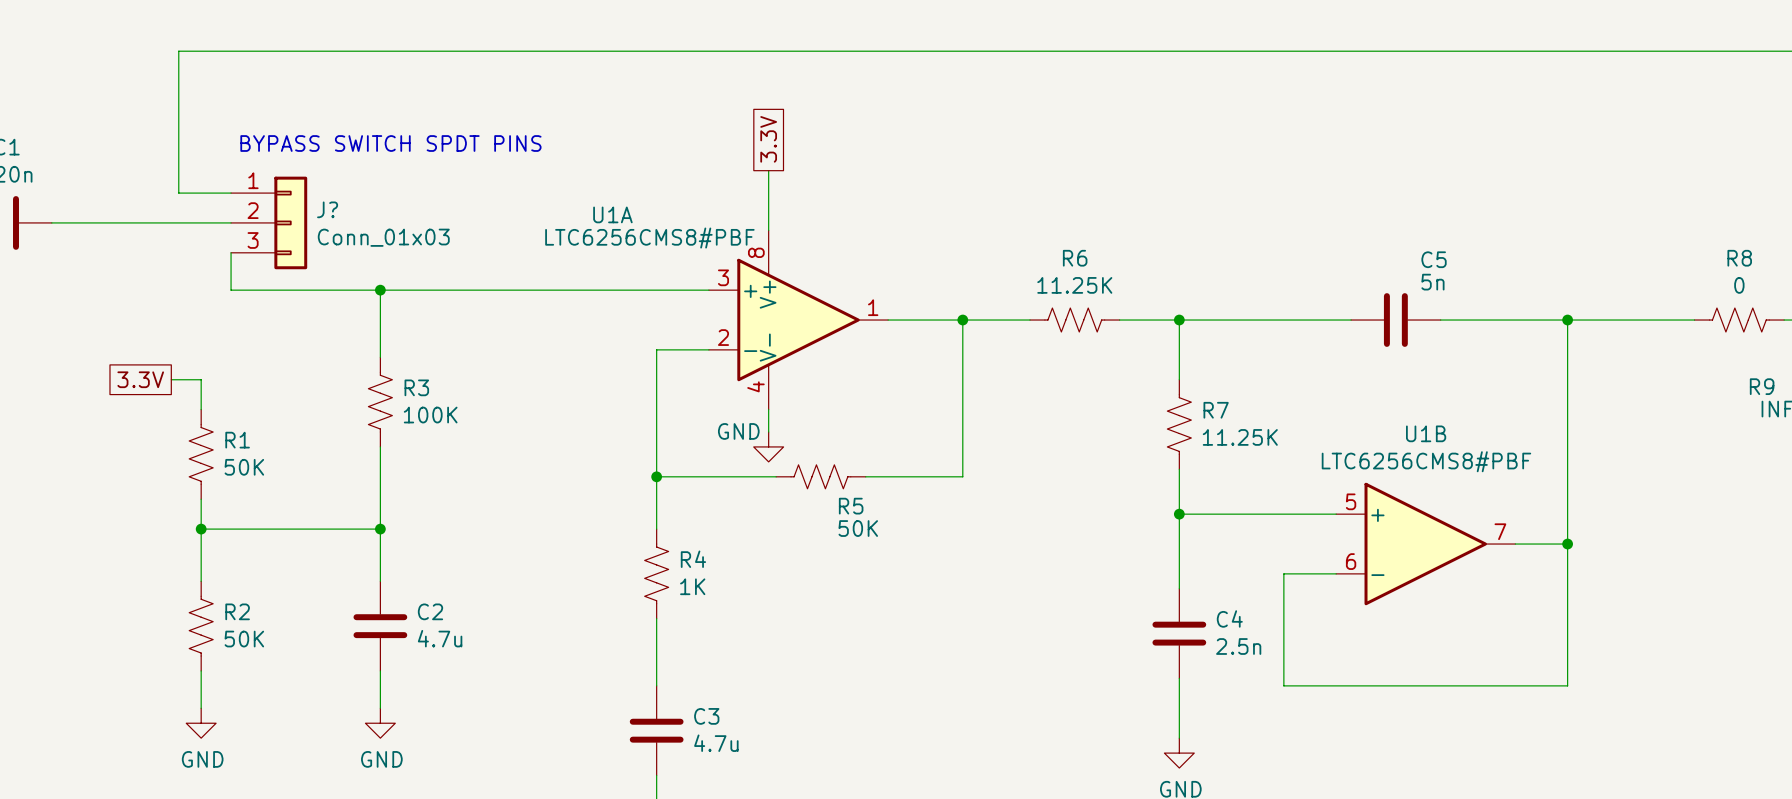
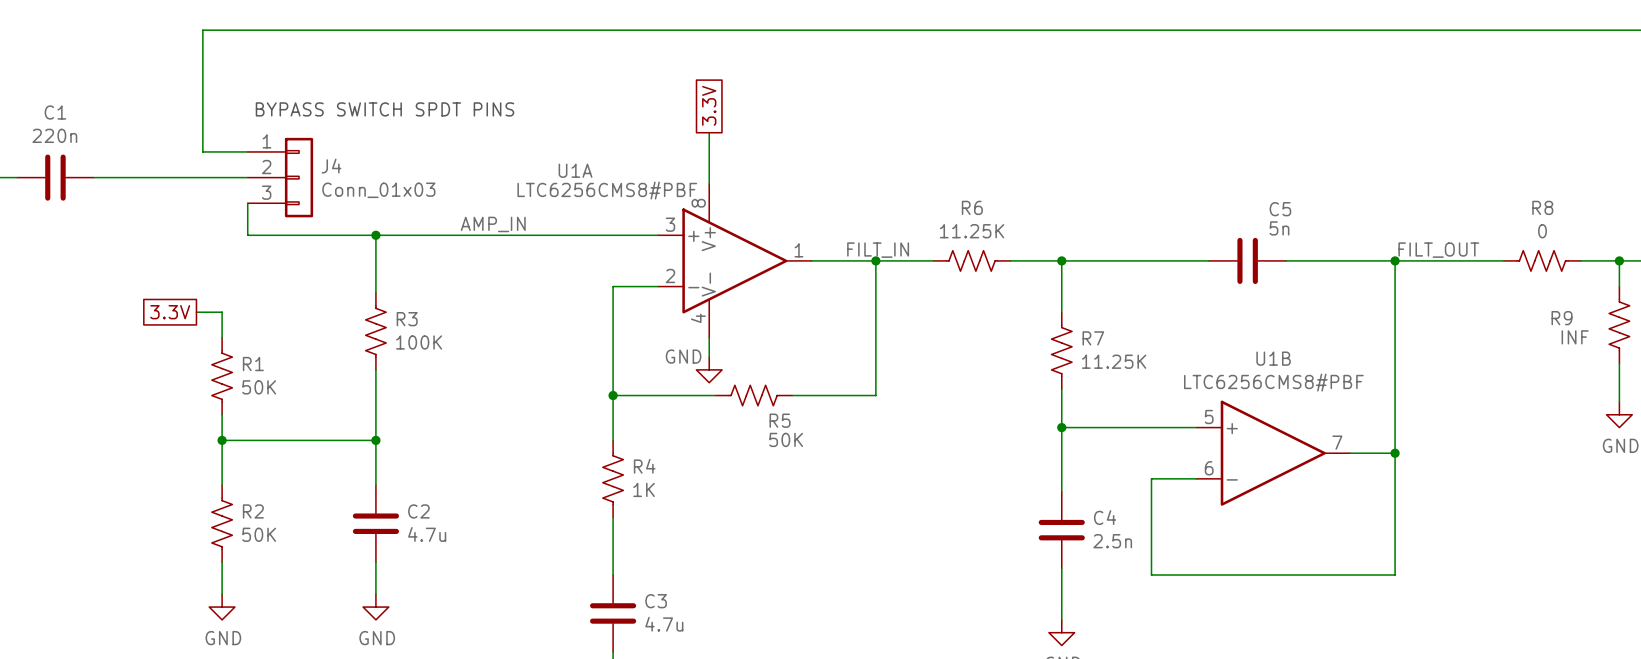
J? name: J? (327, 209) -> J4 (331, 166)
label: none -> AMP_IN (493, 224)
label: none -> FILT_IN (878, 250)
label: none -> FILT_OUT (1438, 250)

